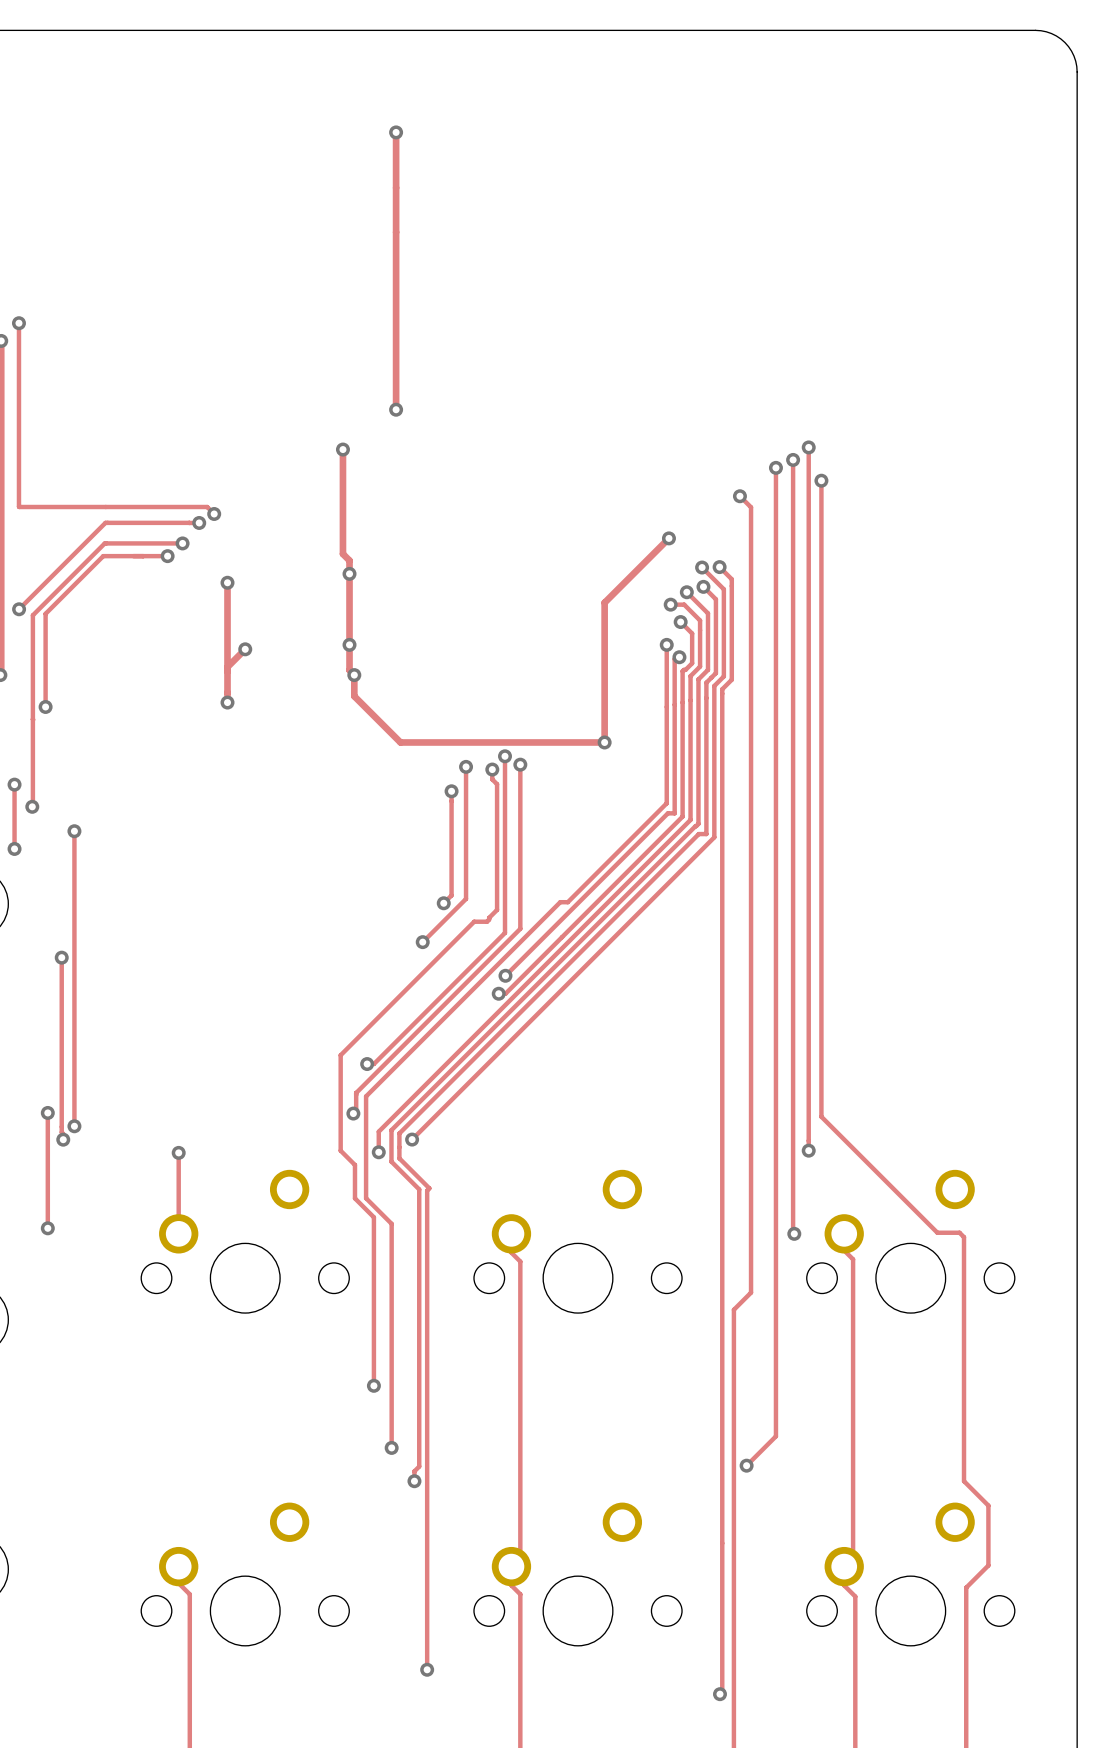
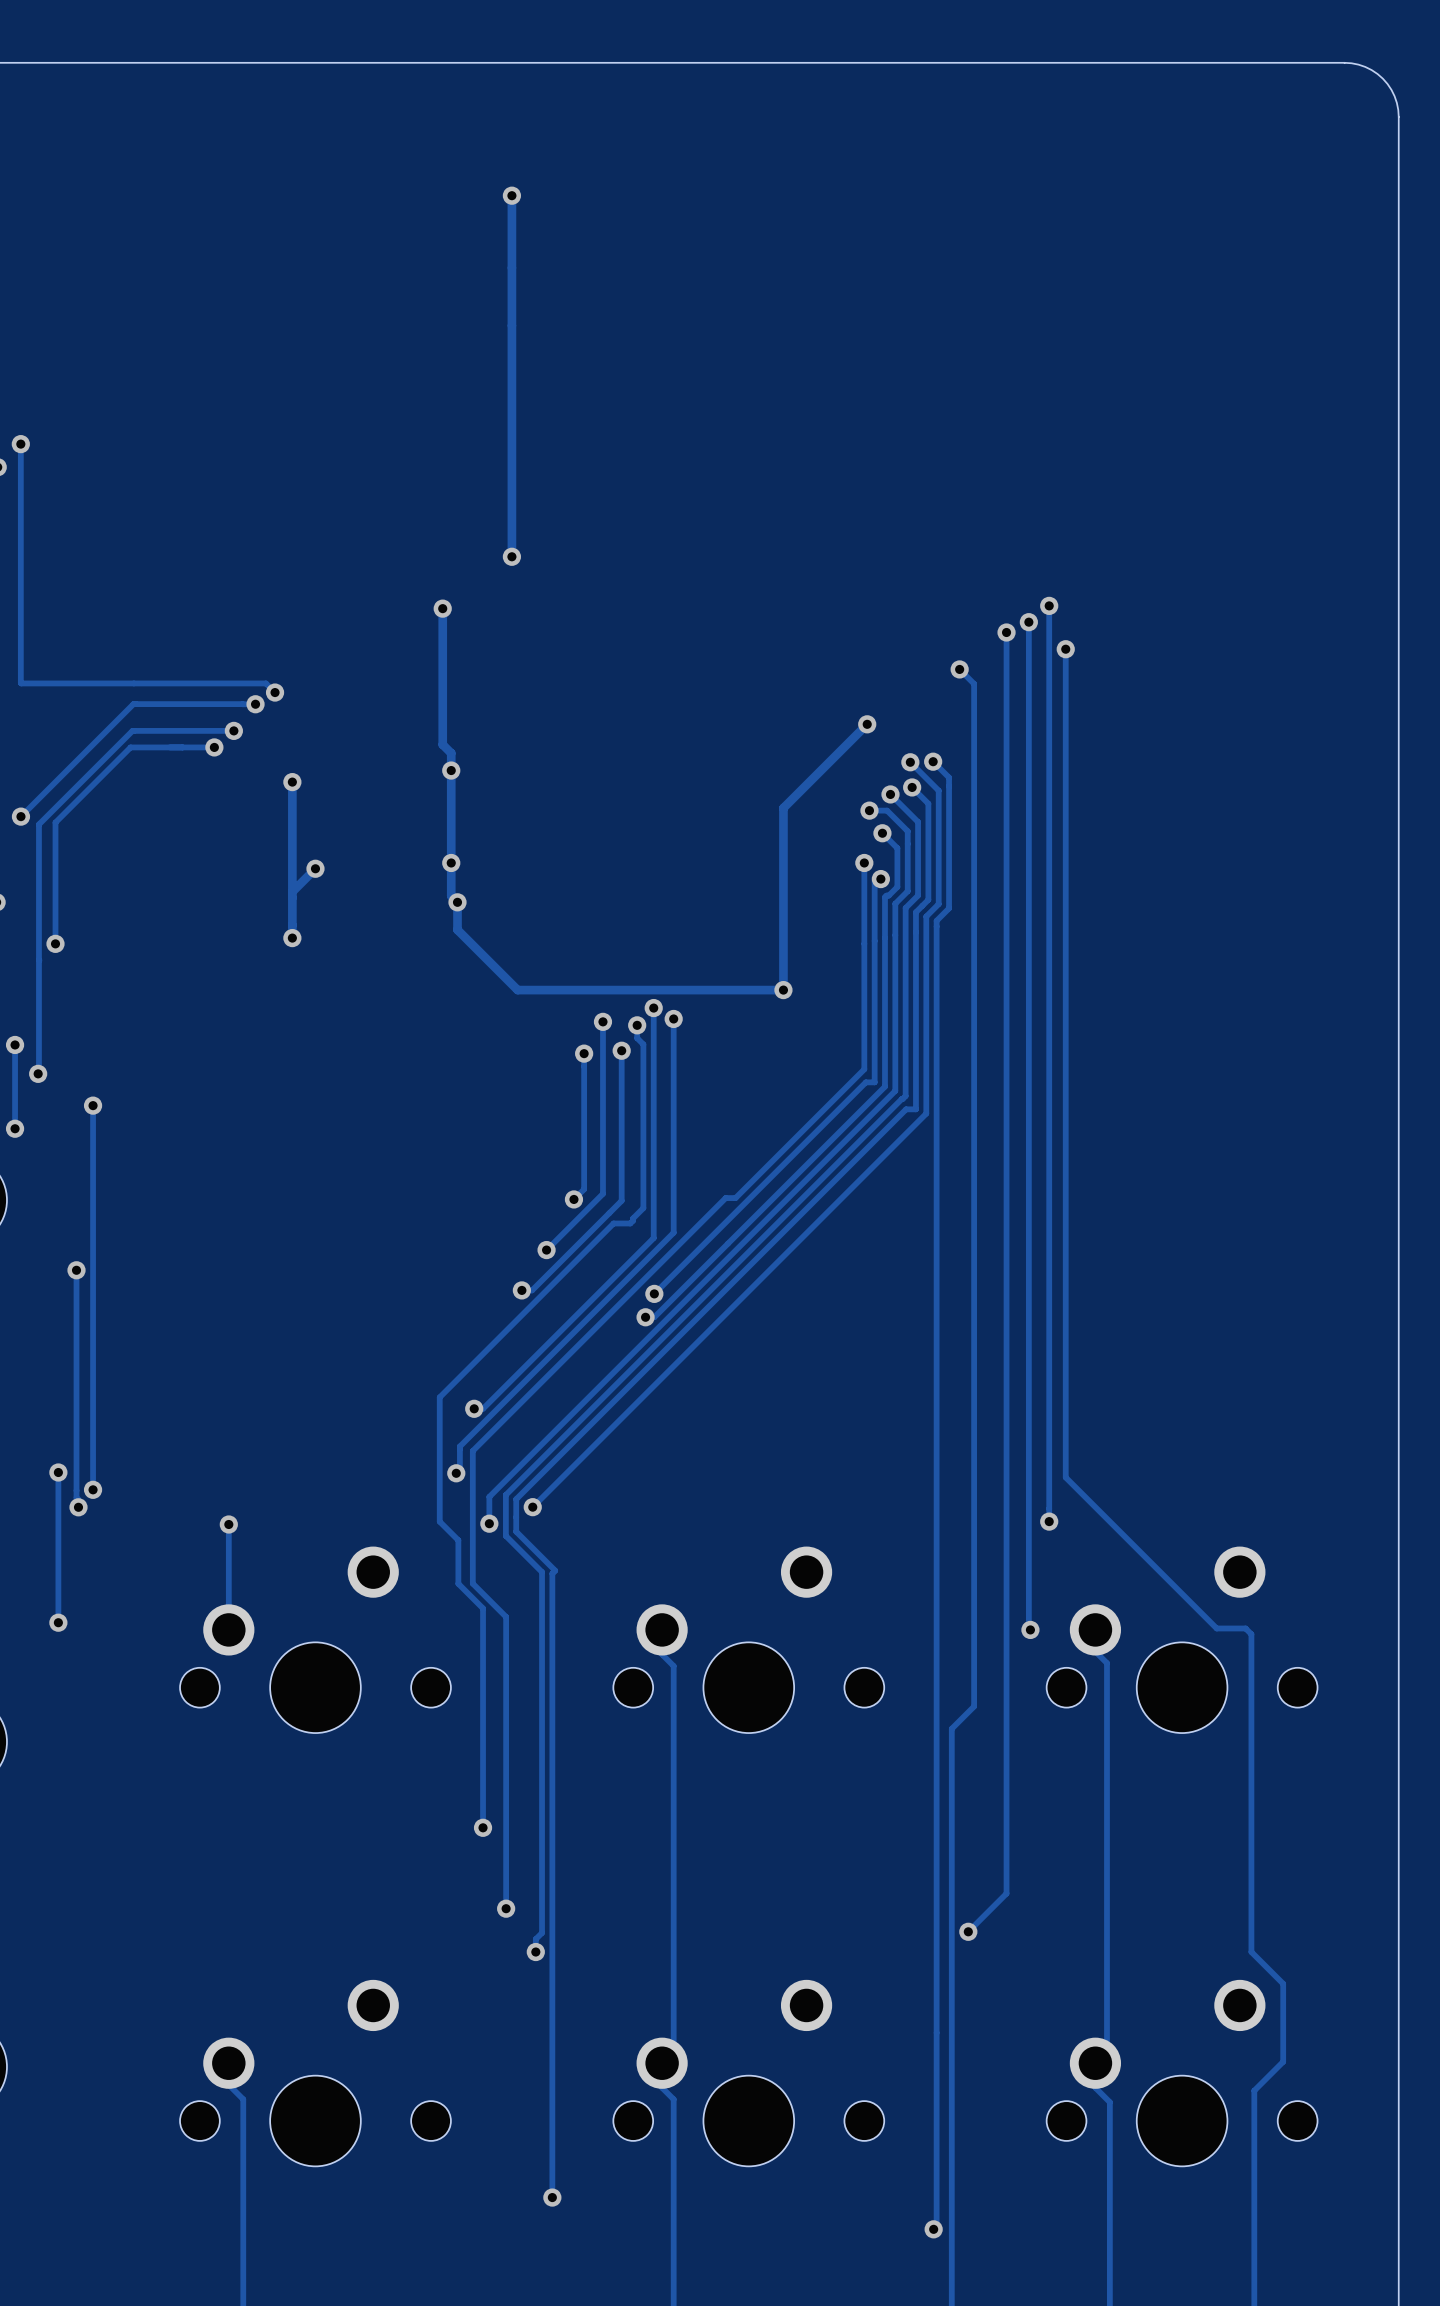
track: none -> (621, 1050) (621, 1200) (532, 1290) (521, 1290)
via: none -> (621, 1050)
via: none -> (521, 1290)

